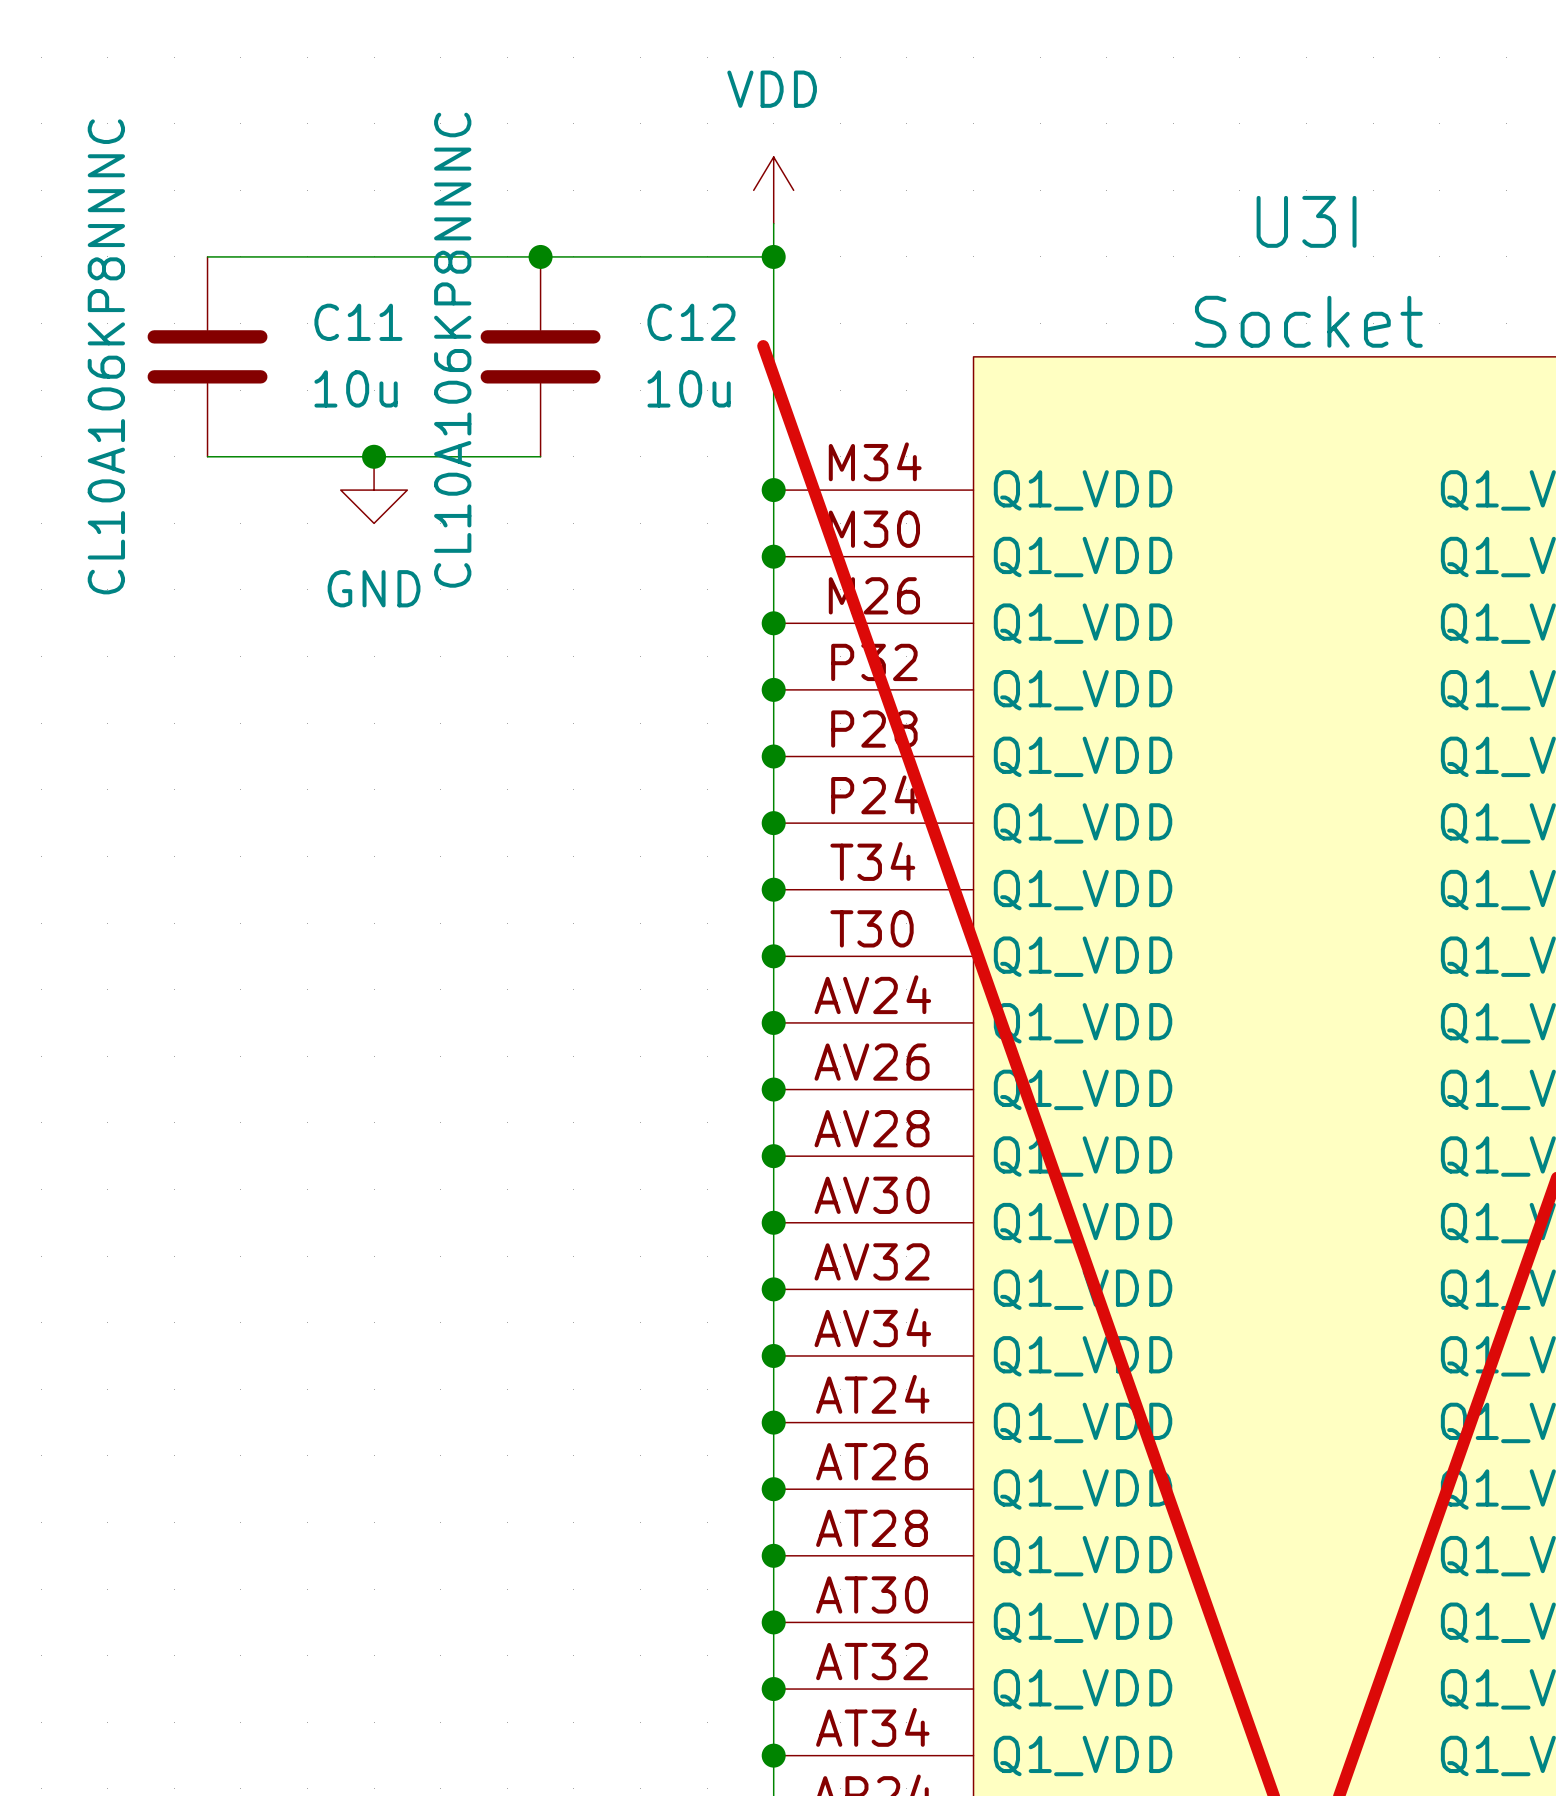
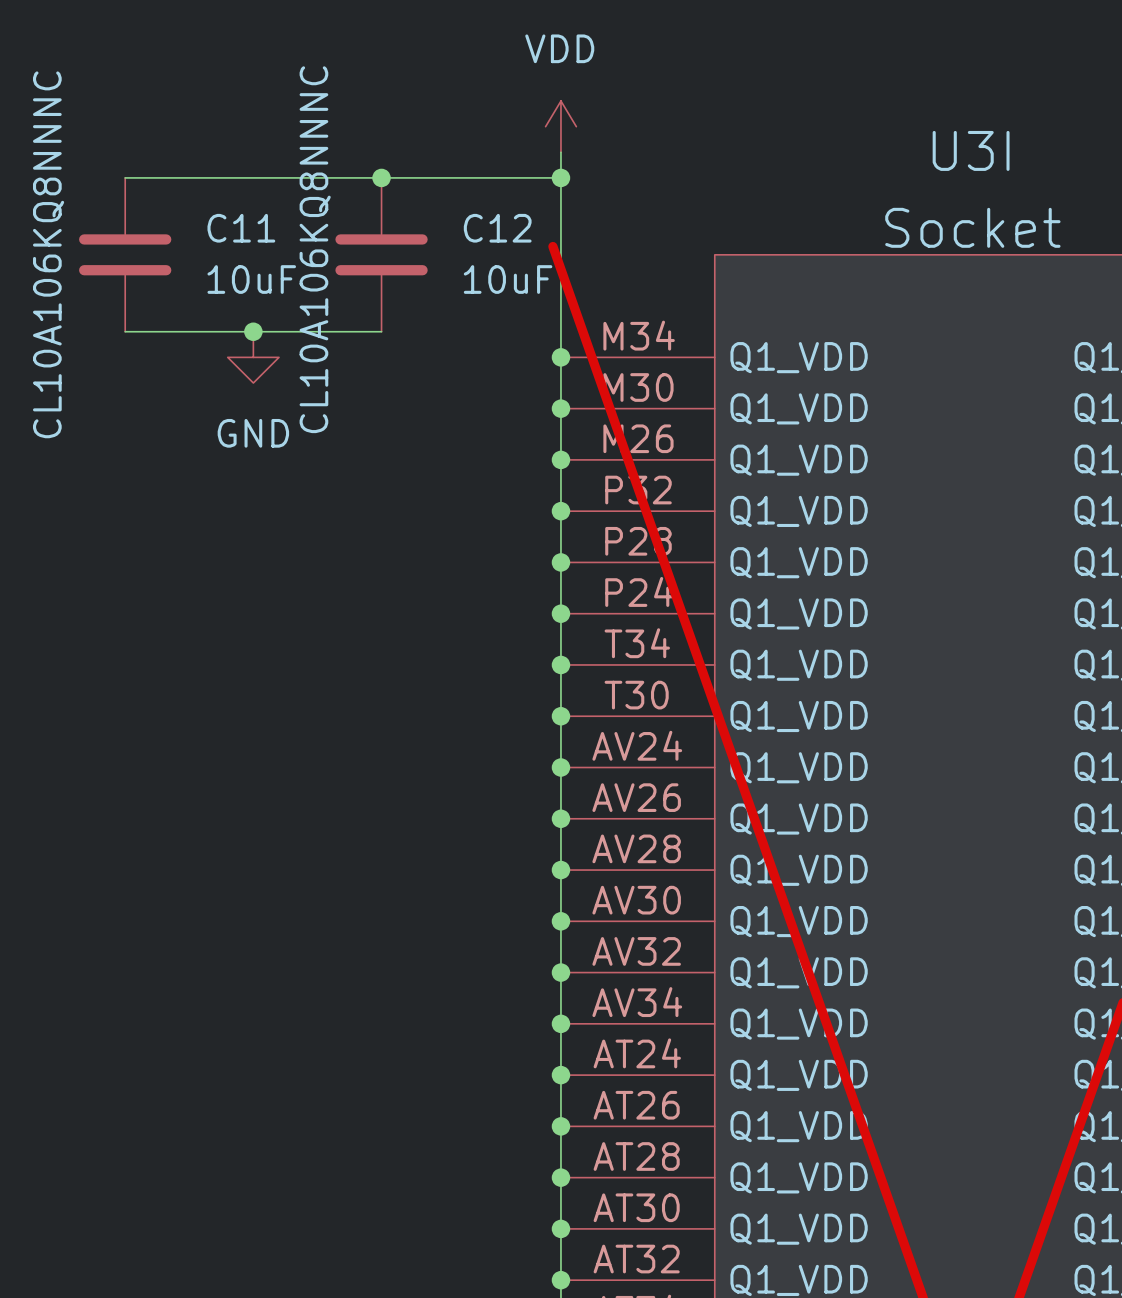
C12 text: CL10A106KP8NNNC (452, 350) -> CL10A106KQ8NNNC (315, 249)
C11 text: CL10A106KP8NNNC (106, 356) -> CL10A106KQ8NNNC (48, 254)
C11 value: 10u (356, 388) -> 10uF (251, 279)
C12 value: 10u (689, 388) -> 10uF (508, 279)

